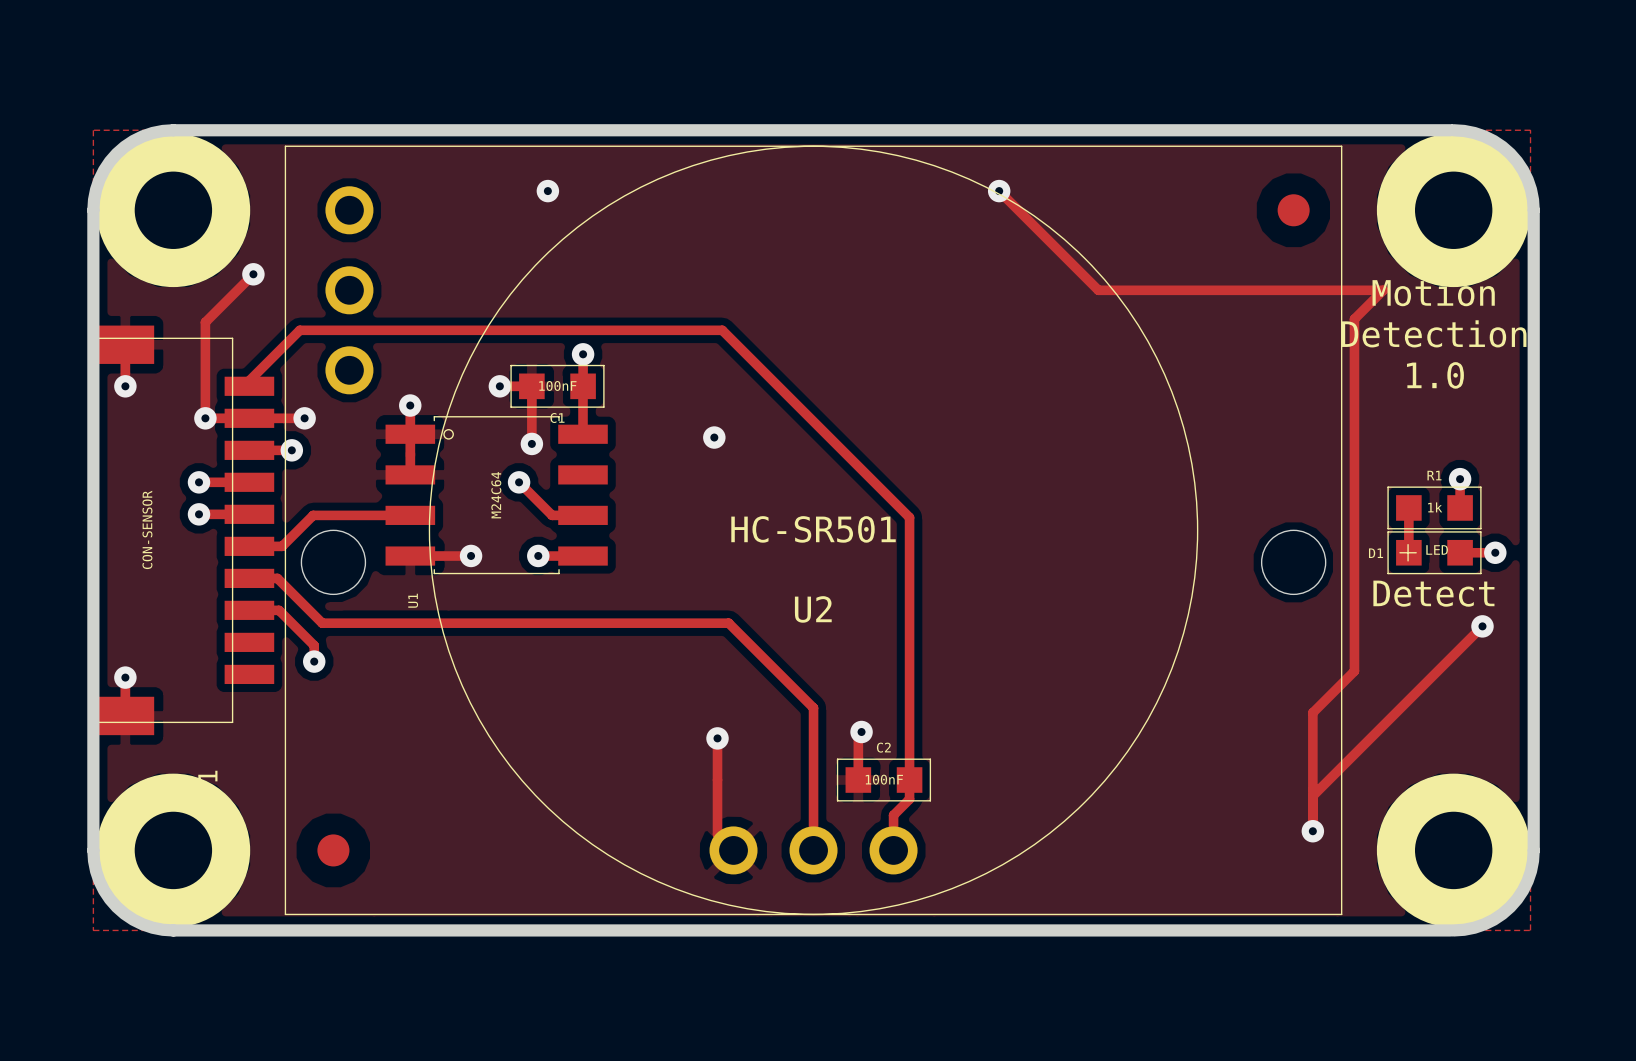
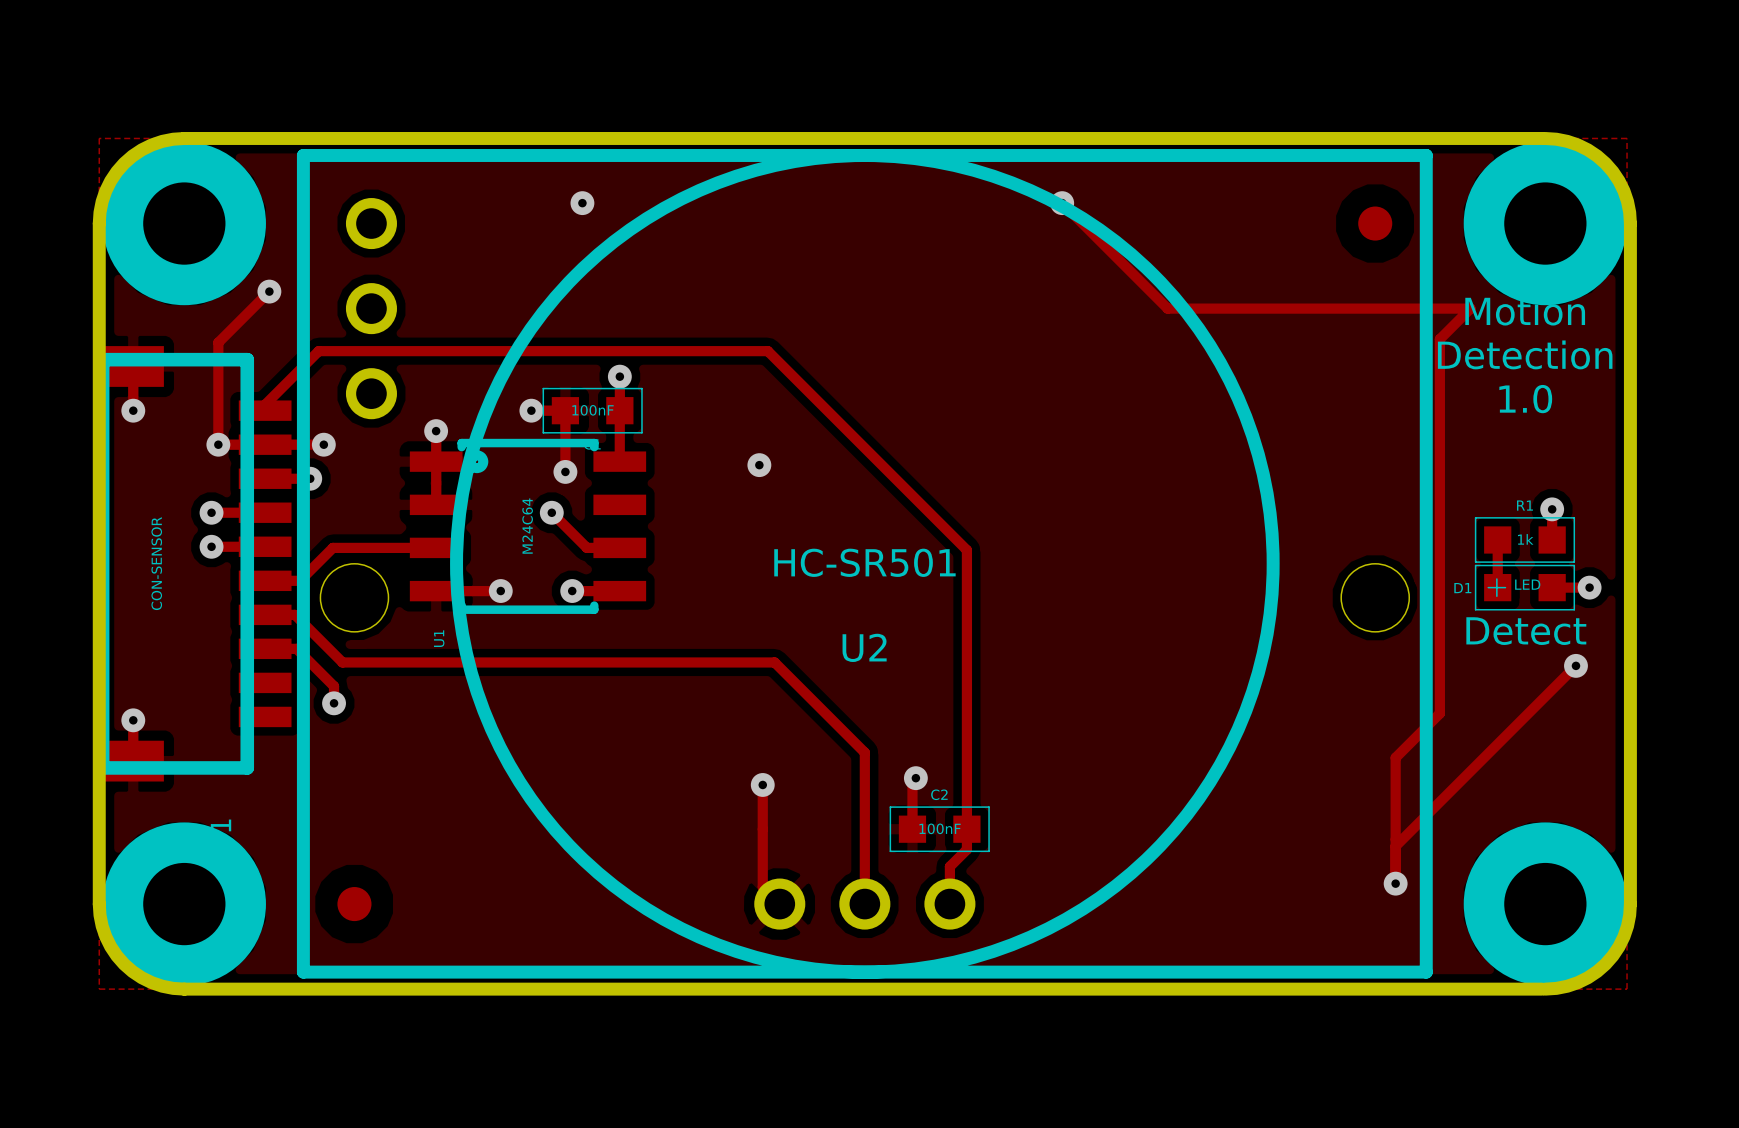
U2 footprint: [285, 146, 1342, 915] -> [296, 149, 1433, 979]
part footprint: [96, 325, 275, 736] -> [95, 346, 292, 782]
U1 footprint: [385, 416, 608, 574] -> [409, 438, 647, 614]

